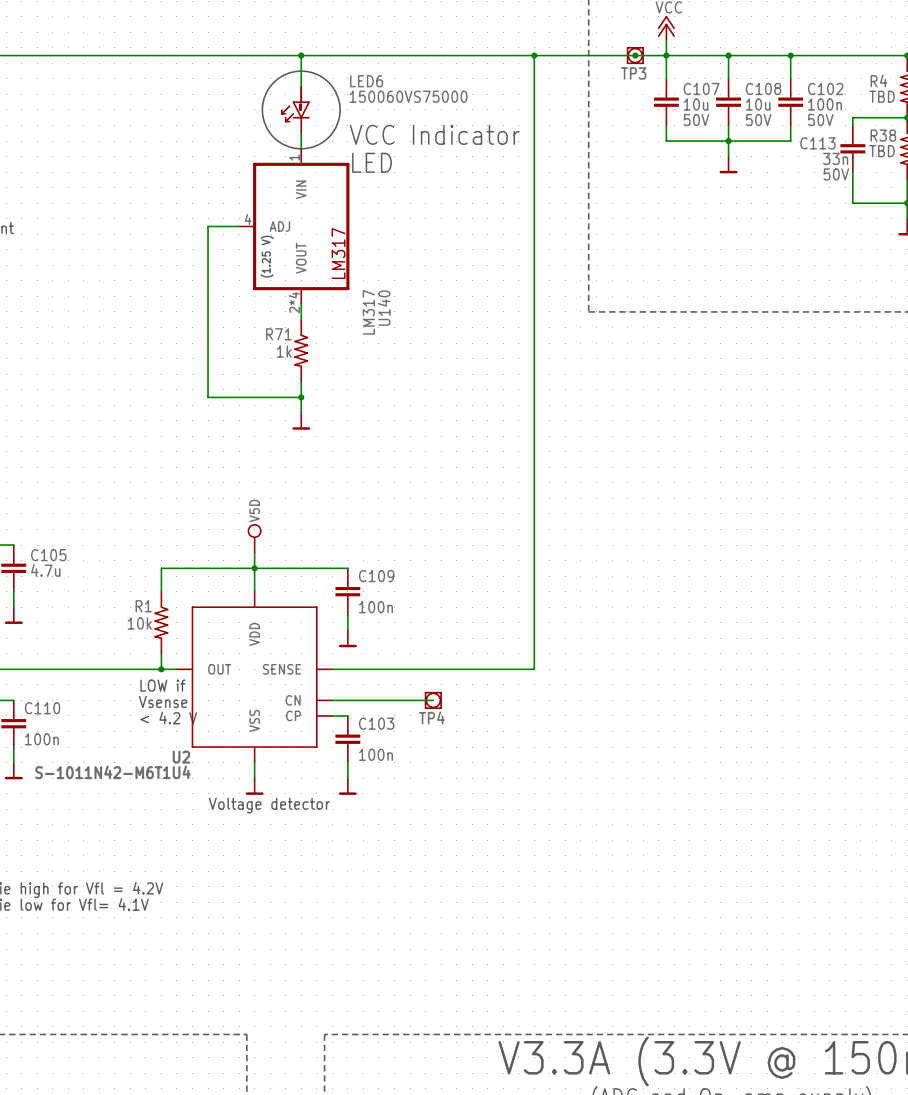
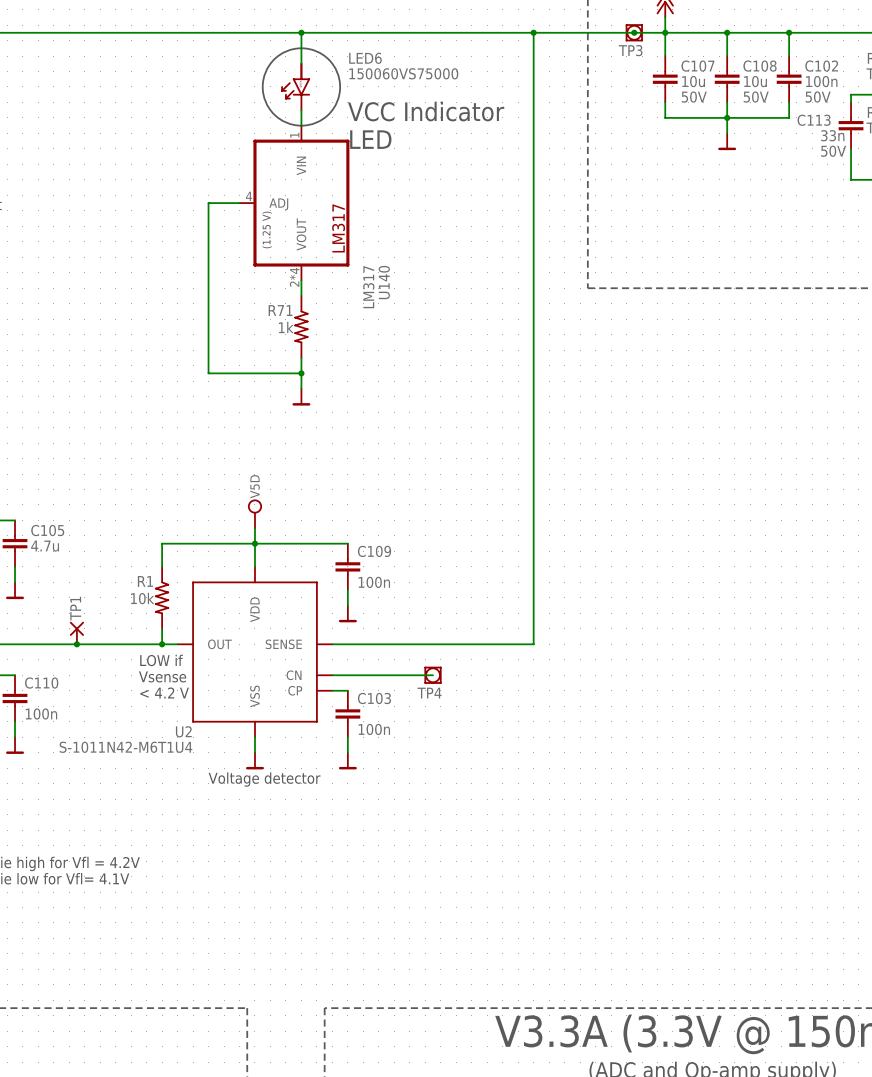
TP1: none -> (76, 633)
junction: none -> (76, 644)

